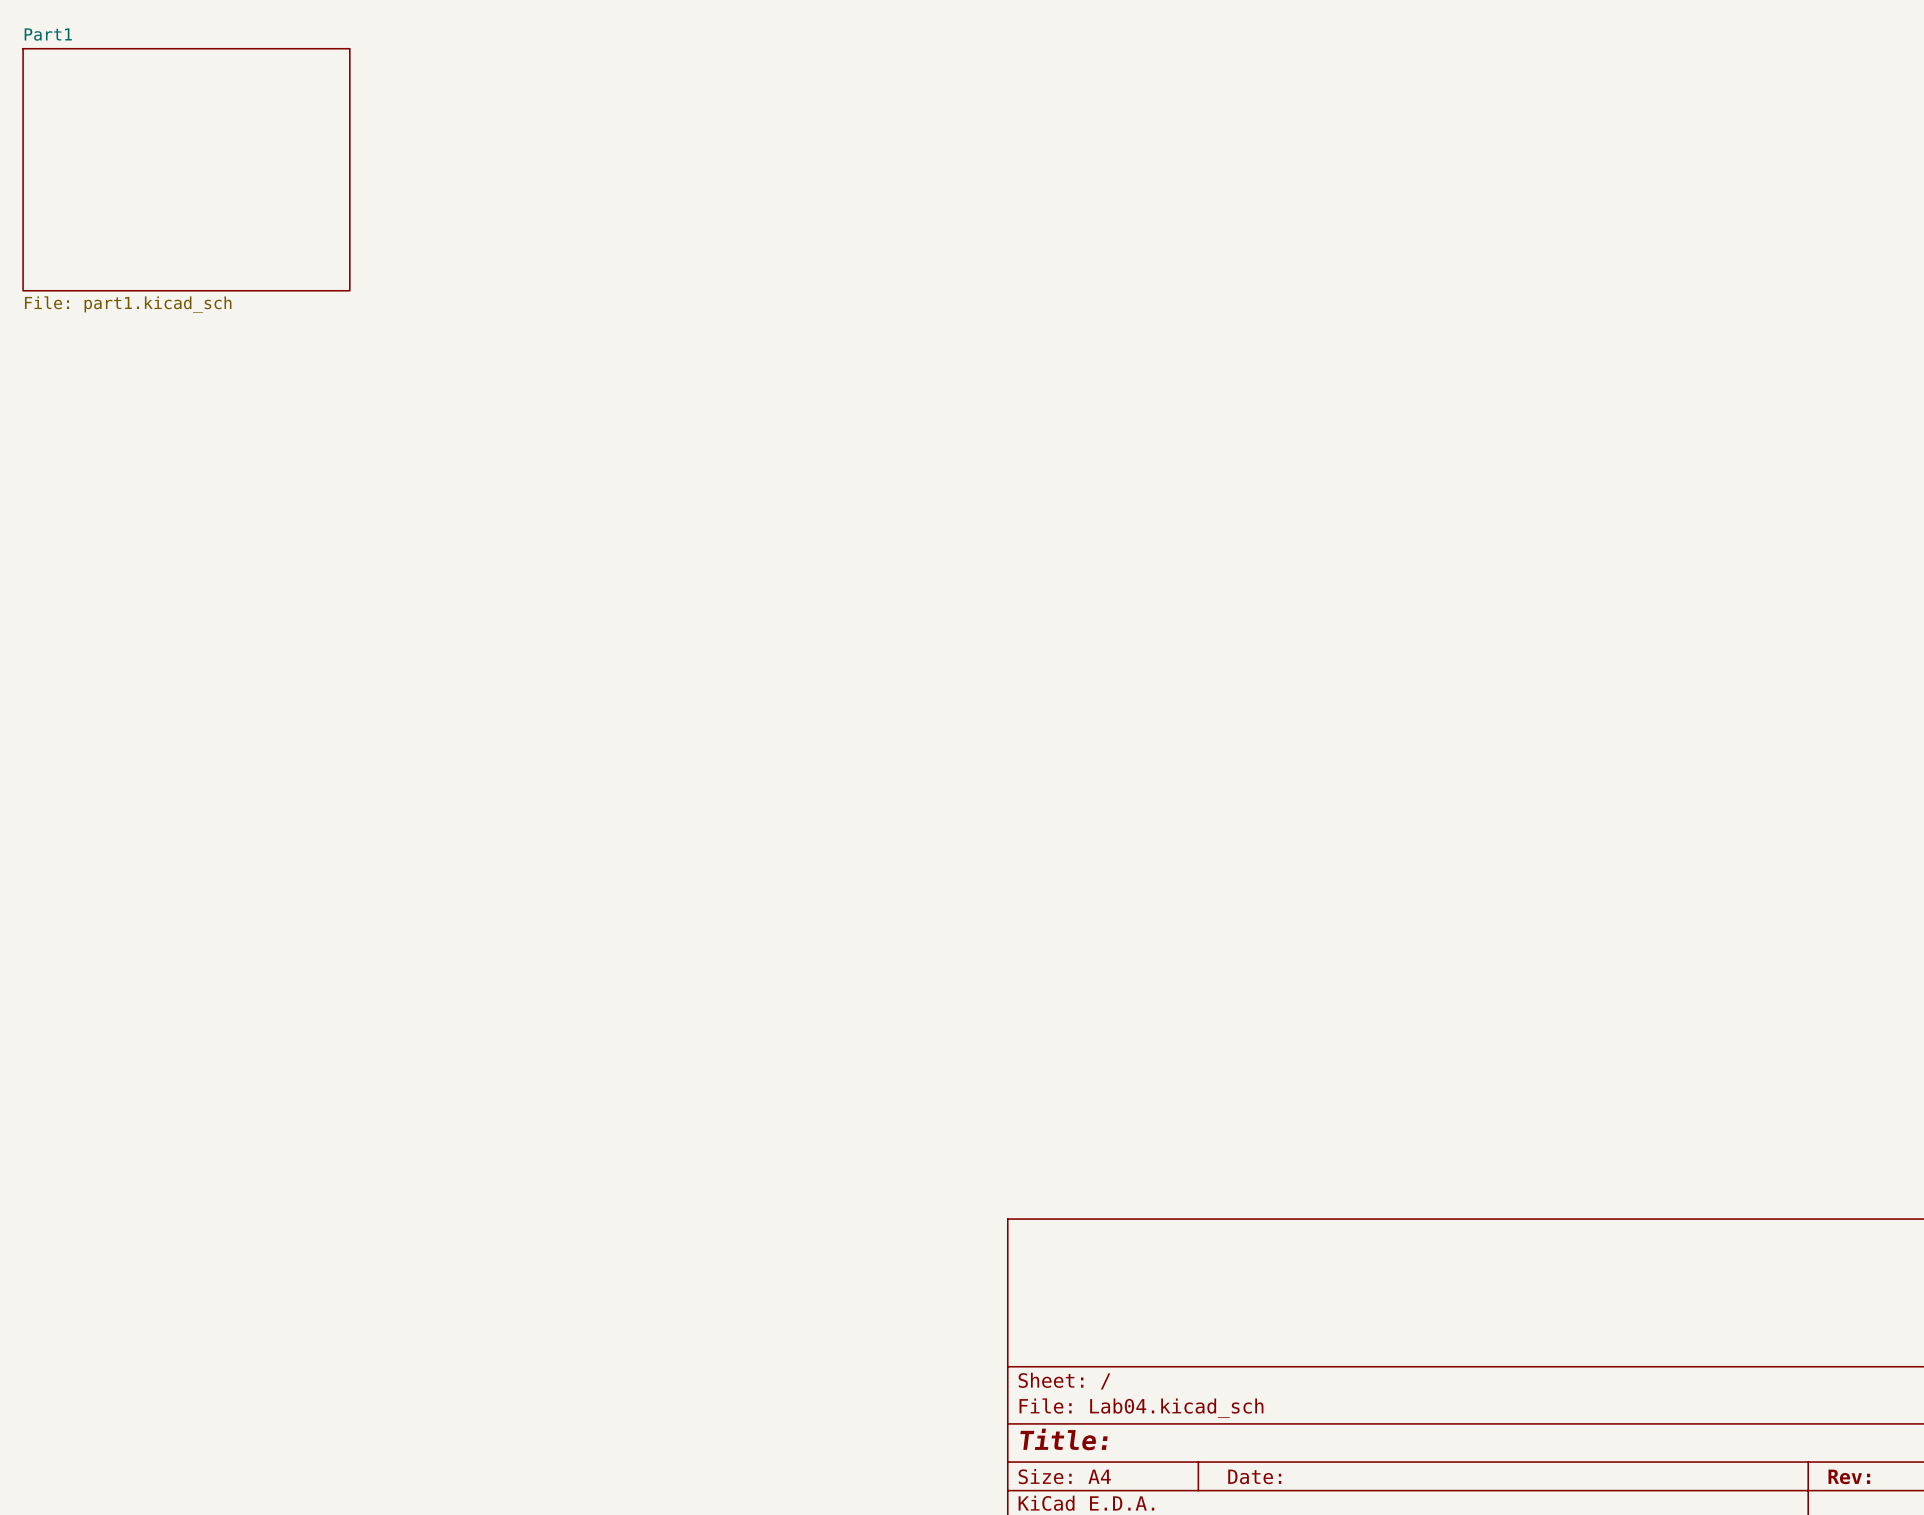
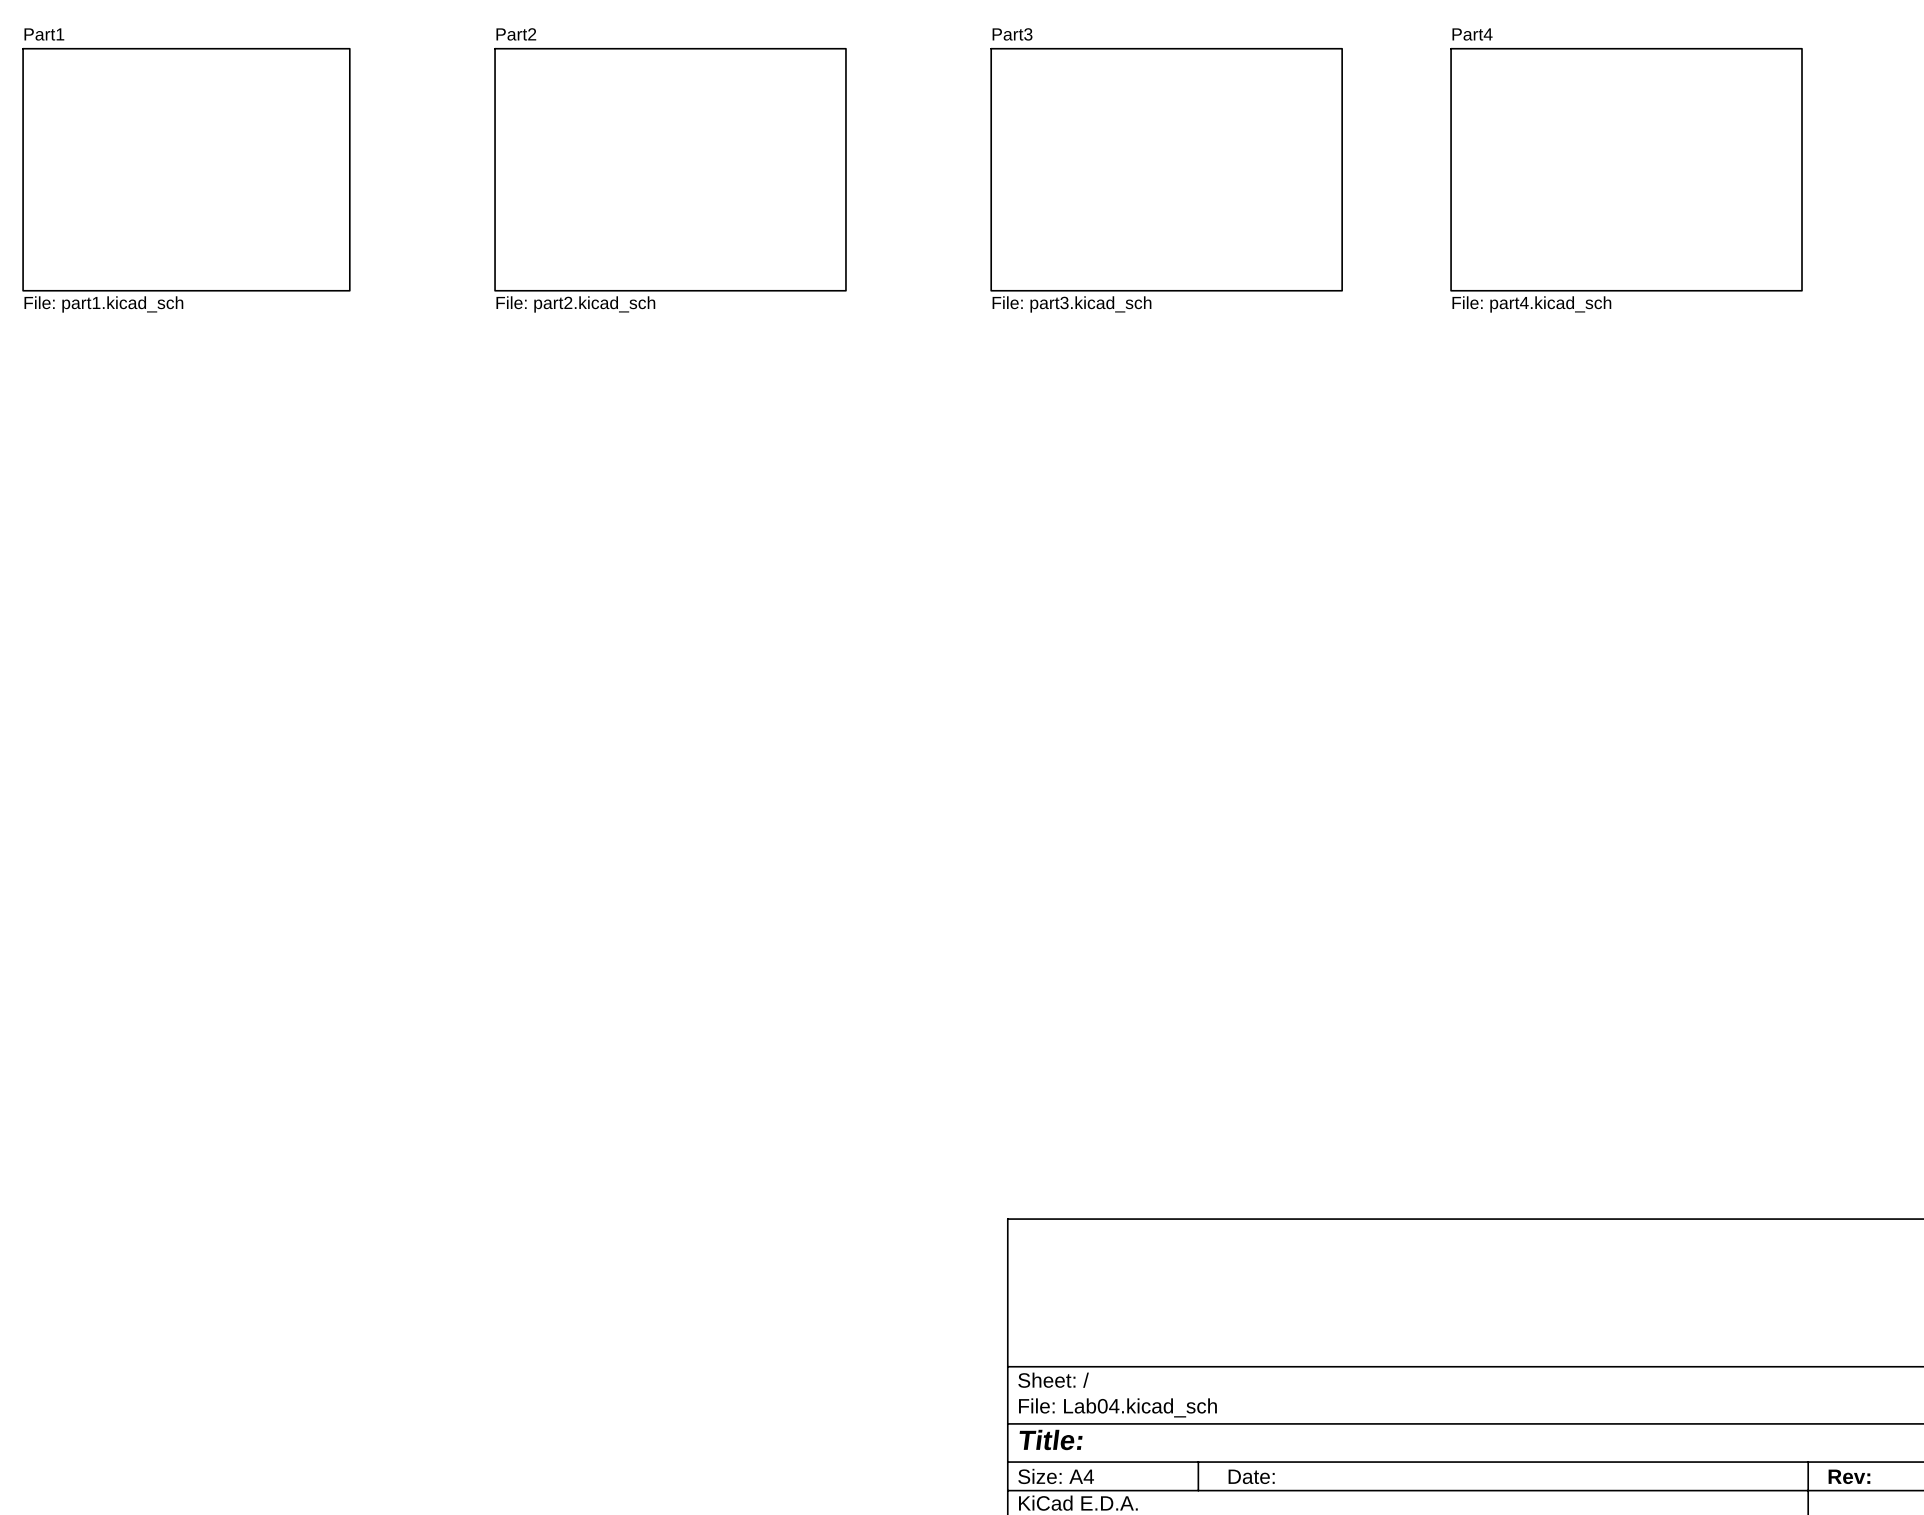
sheet Part2: none -> File: part2.kicad_sch (670, 169)
sheet Part3: none -> File: part3.kicad_sch (1166, 169)
sheet Part4: none -> File: part4.kicad_sch (1626, 169)

